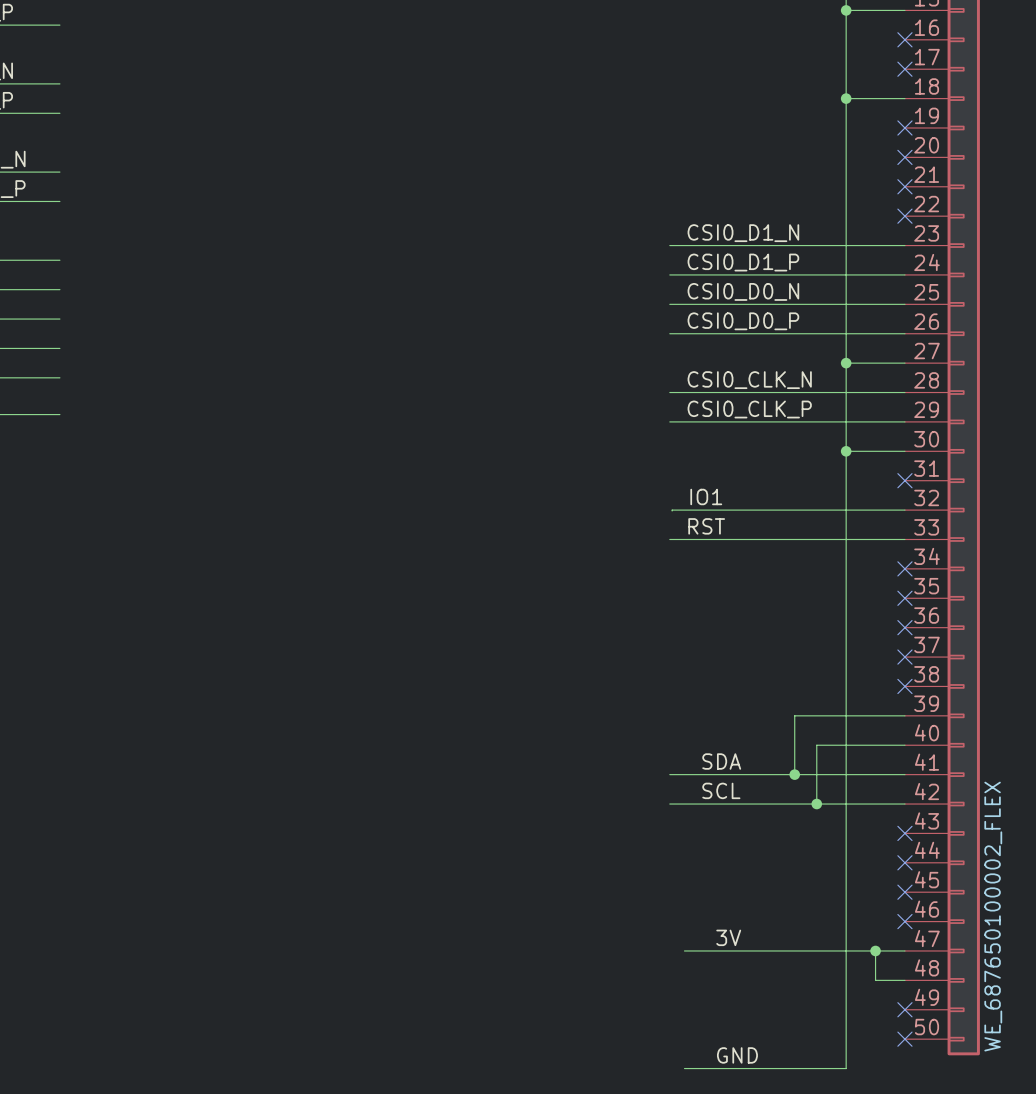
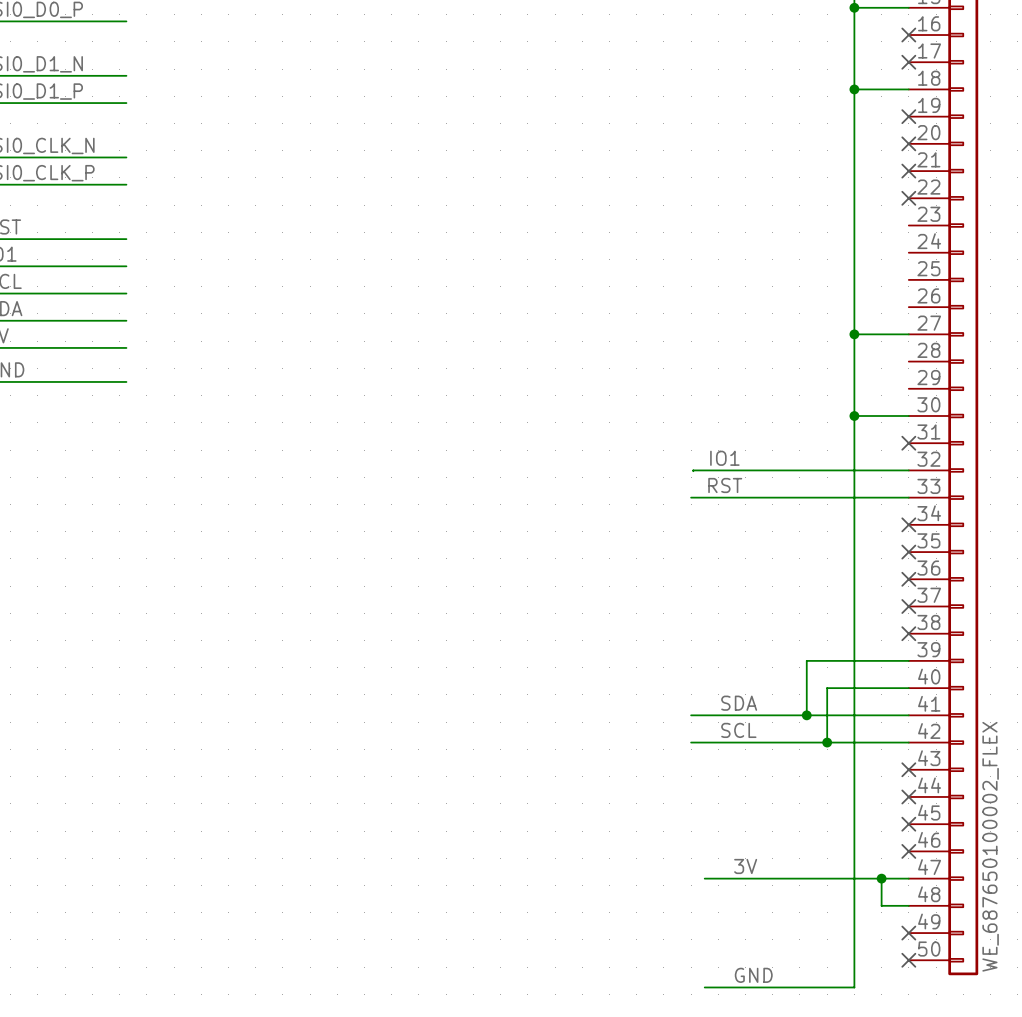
label: CSI0_D1_N (743, 233) -> none
wire: (669, 245) (904, 245) -> none
label: CSI0_D1_P (743, 262) -> none
wire: (669, 274) (904, 274) -> none
label: CSI0_D0_N (743, 291) -> none
wire: (669, 304) (904, 304) -> none
label: CSI0_D0_P (743, 321) -> none
wire: (669, 333) (904, 333) -> none
label: CSI0_CLK_N (749, 380) -> none
wire: (669, 392) (904, 392) -> none
label: CSI0_CLK_P (749, 409) -> none
wire: (669, 421) (904, 421) -> none

